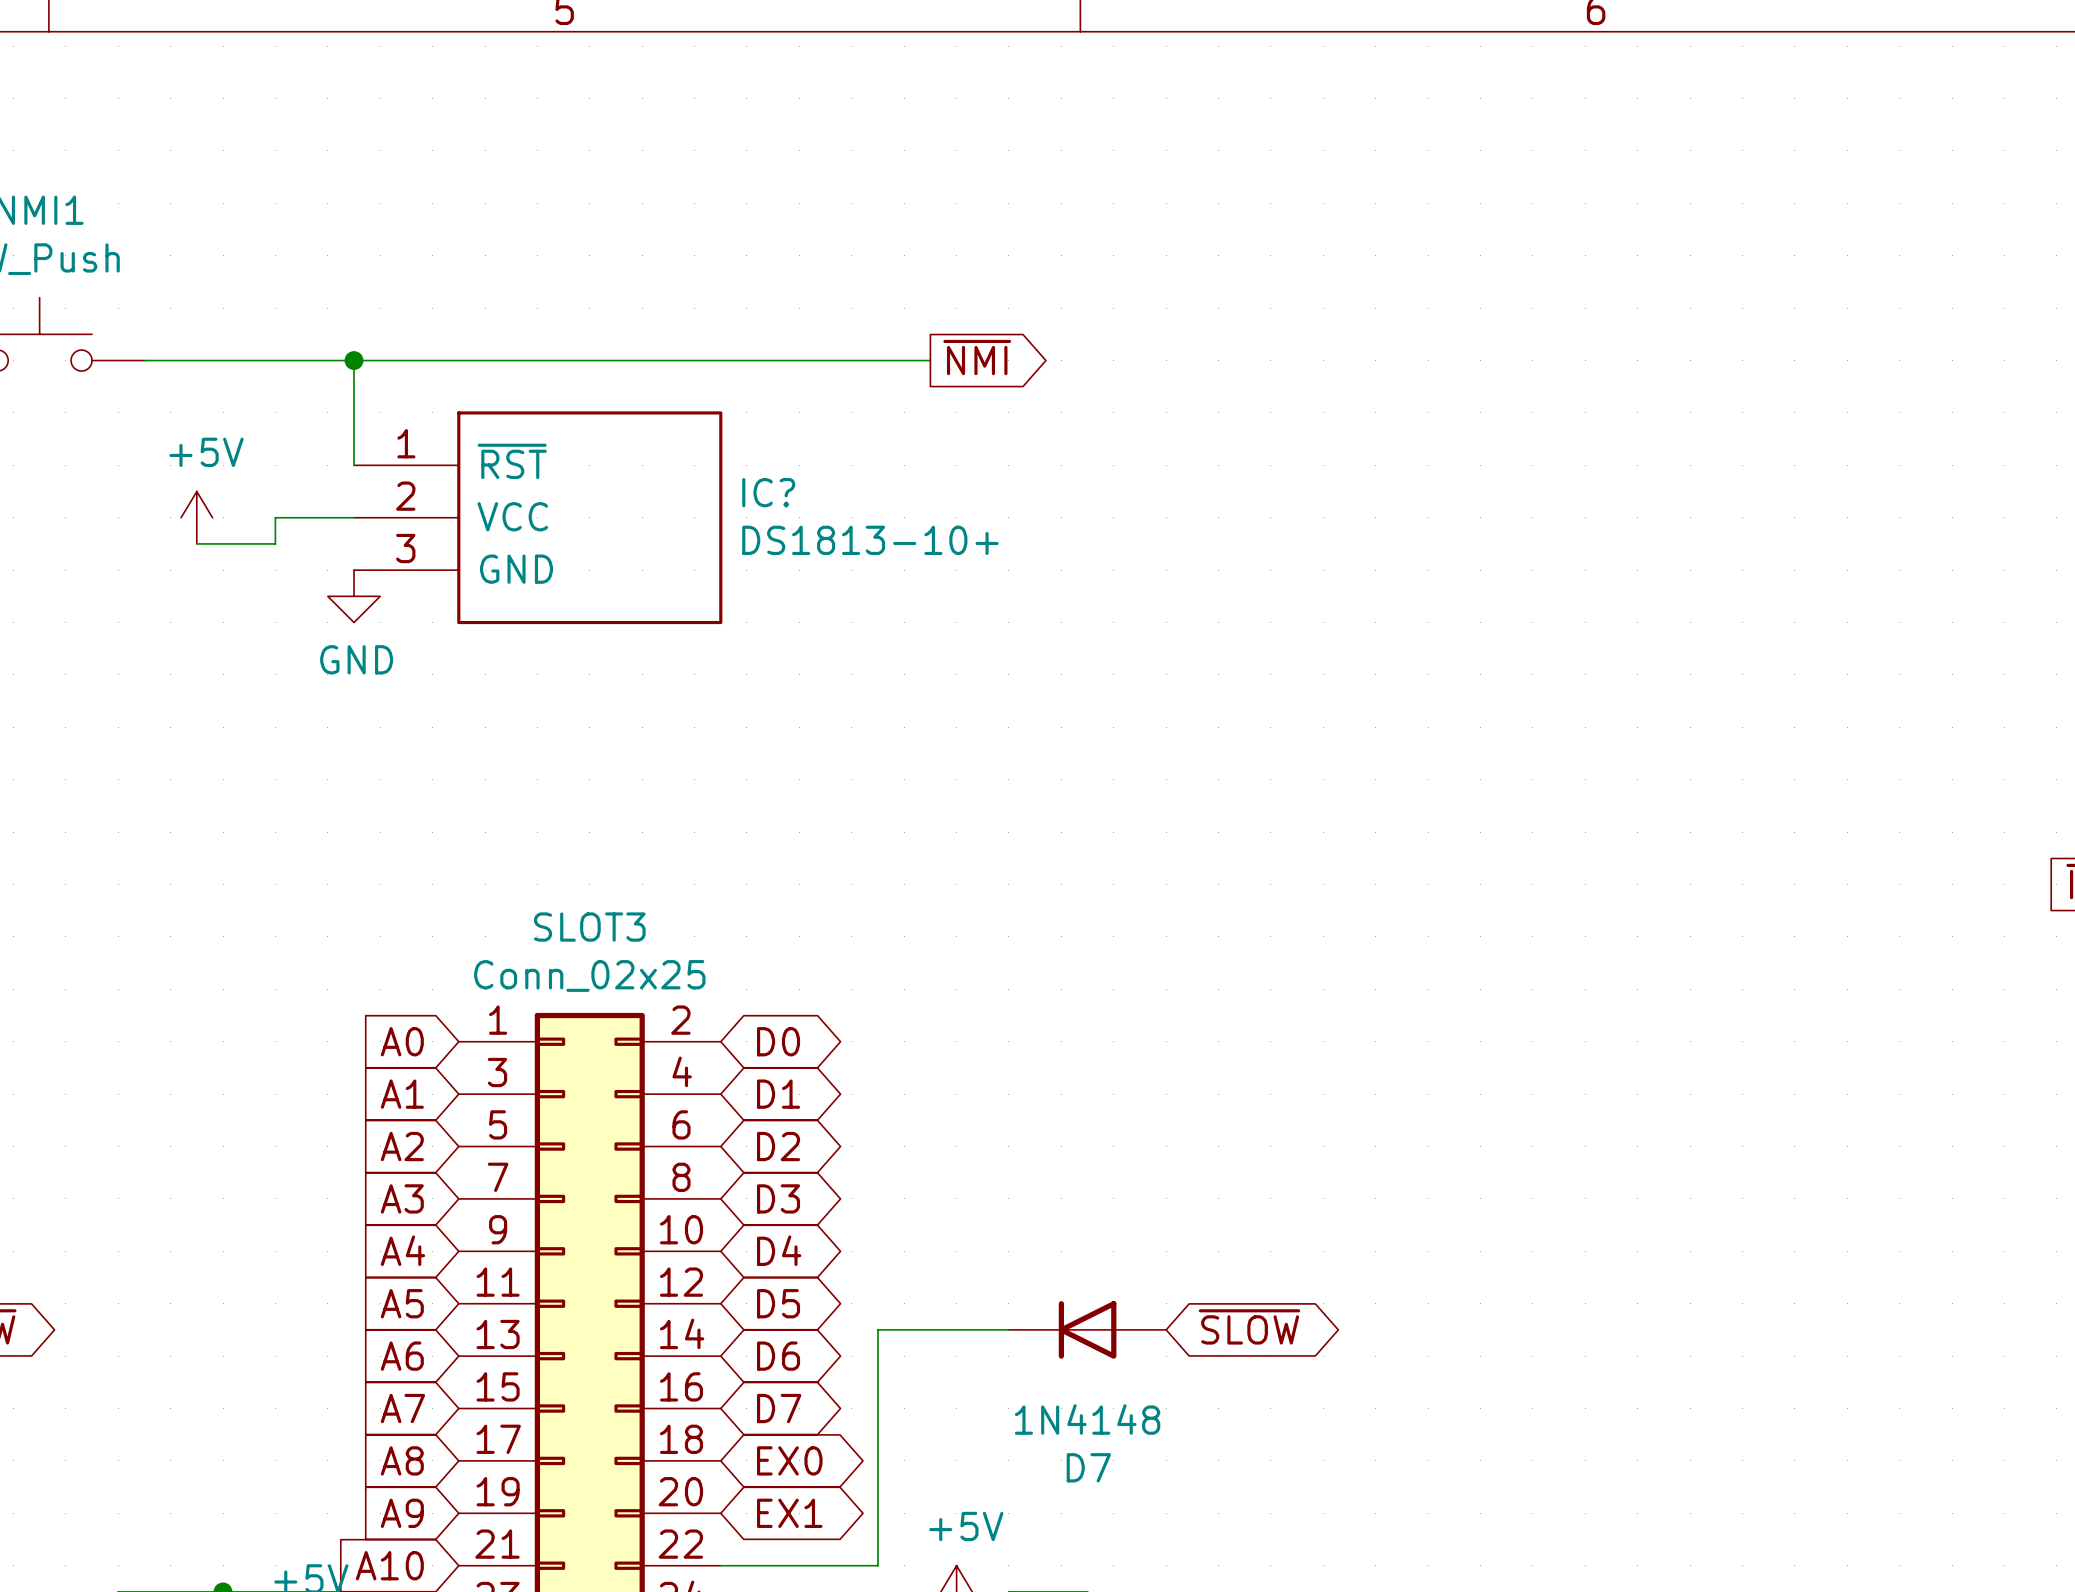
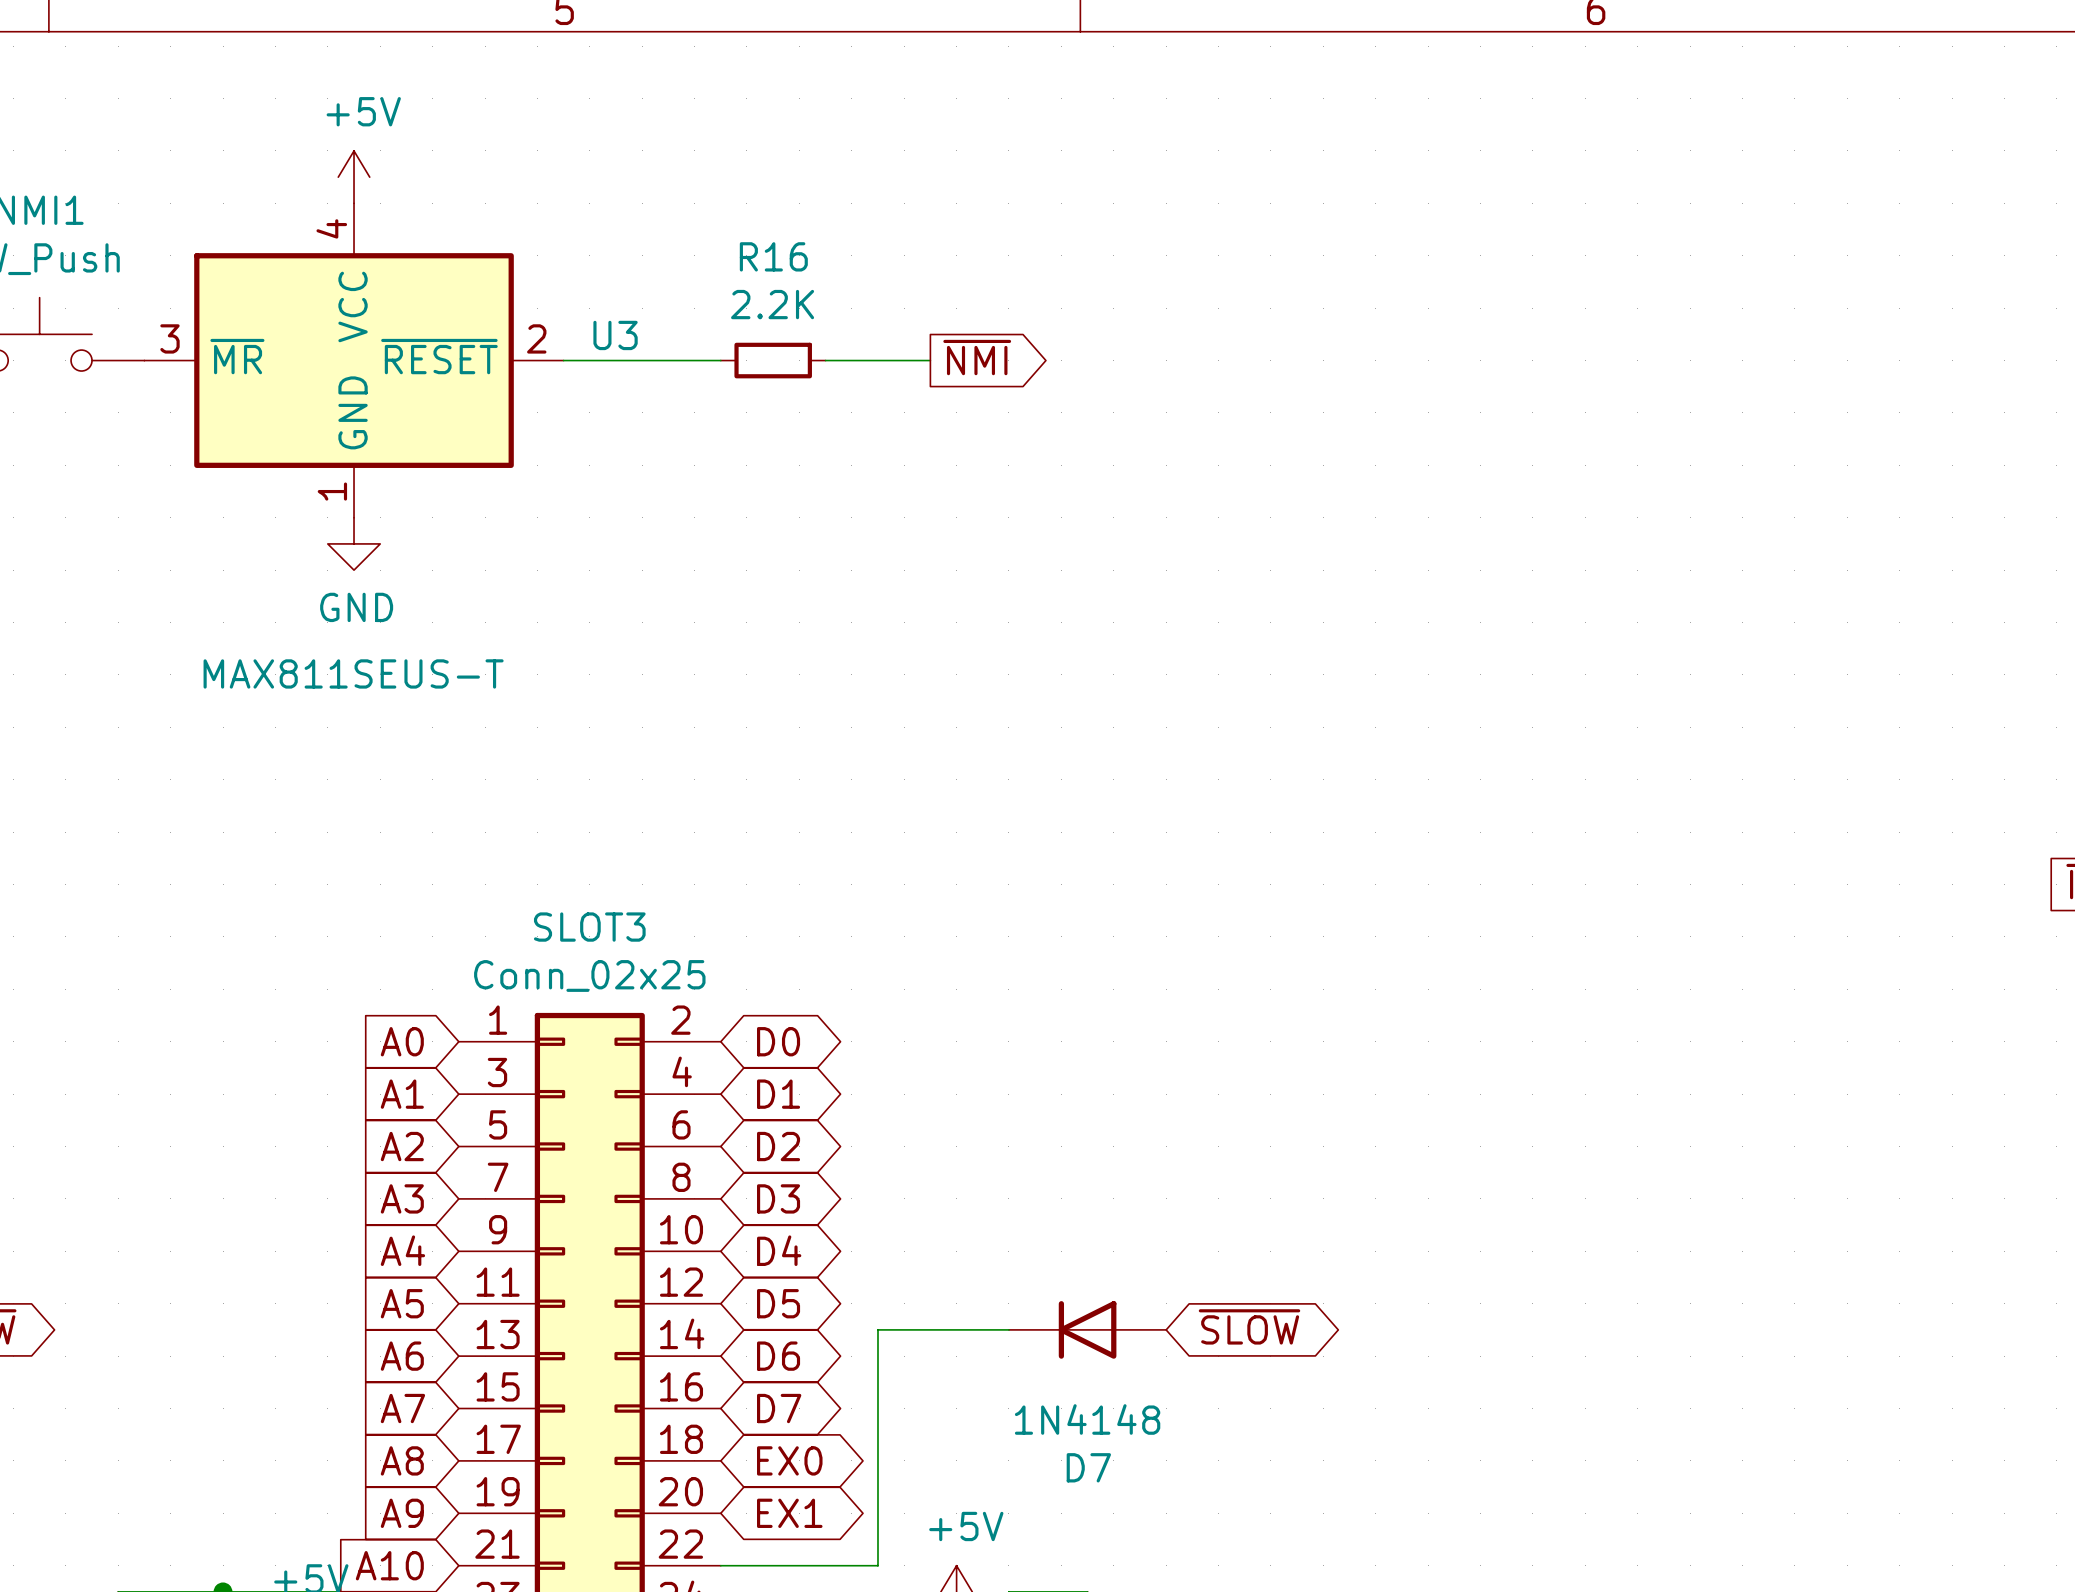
U3: none -> MAX811SEUS-T (354, 360)
junction: (354, 360) -> none
wire: (720, 360) (825, 360) -> none
R16: none -> 2.2K (773, 360)
power symbol position: +5V (196, 517) -> +5V (354, 177)
wire: (354, 517) (275, 517) (275, 543) (196, 543) -> none
IC?: DS1813-10+ (538, 517) -> none
power symbol position: GND (354, 596) -> GND (354, 543)

